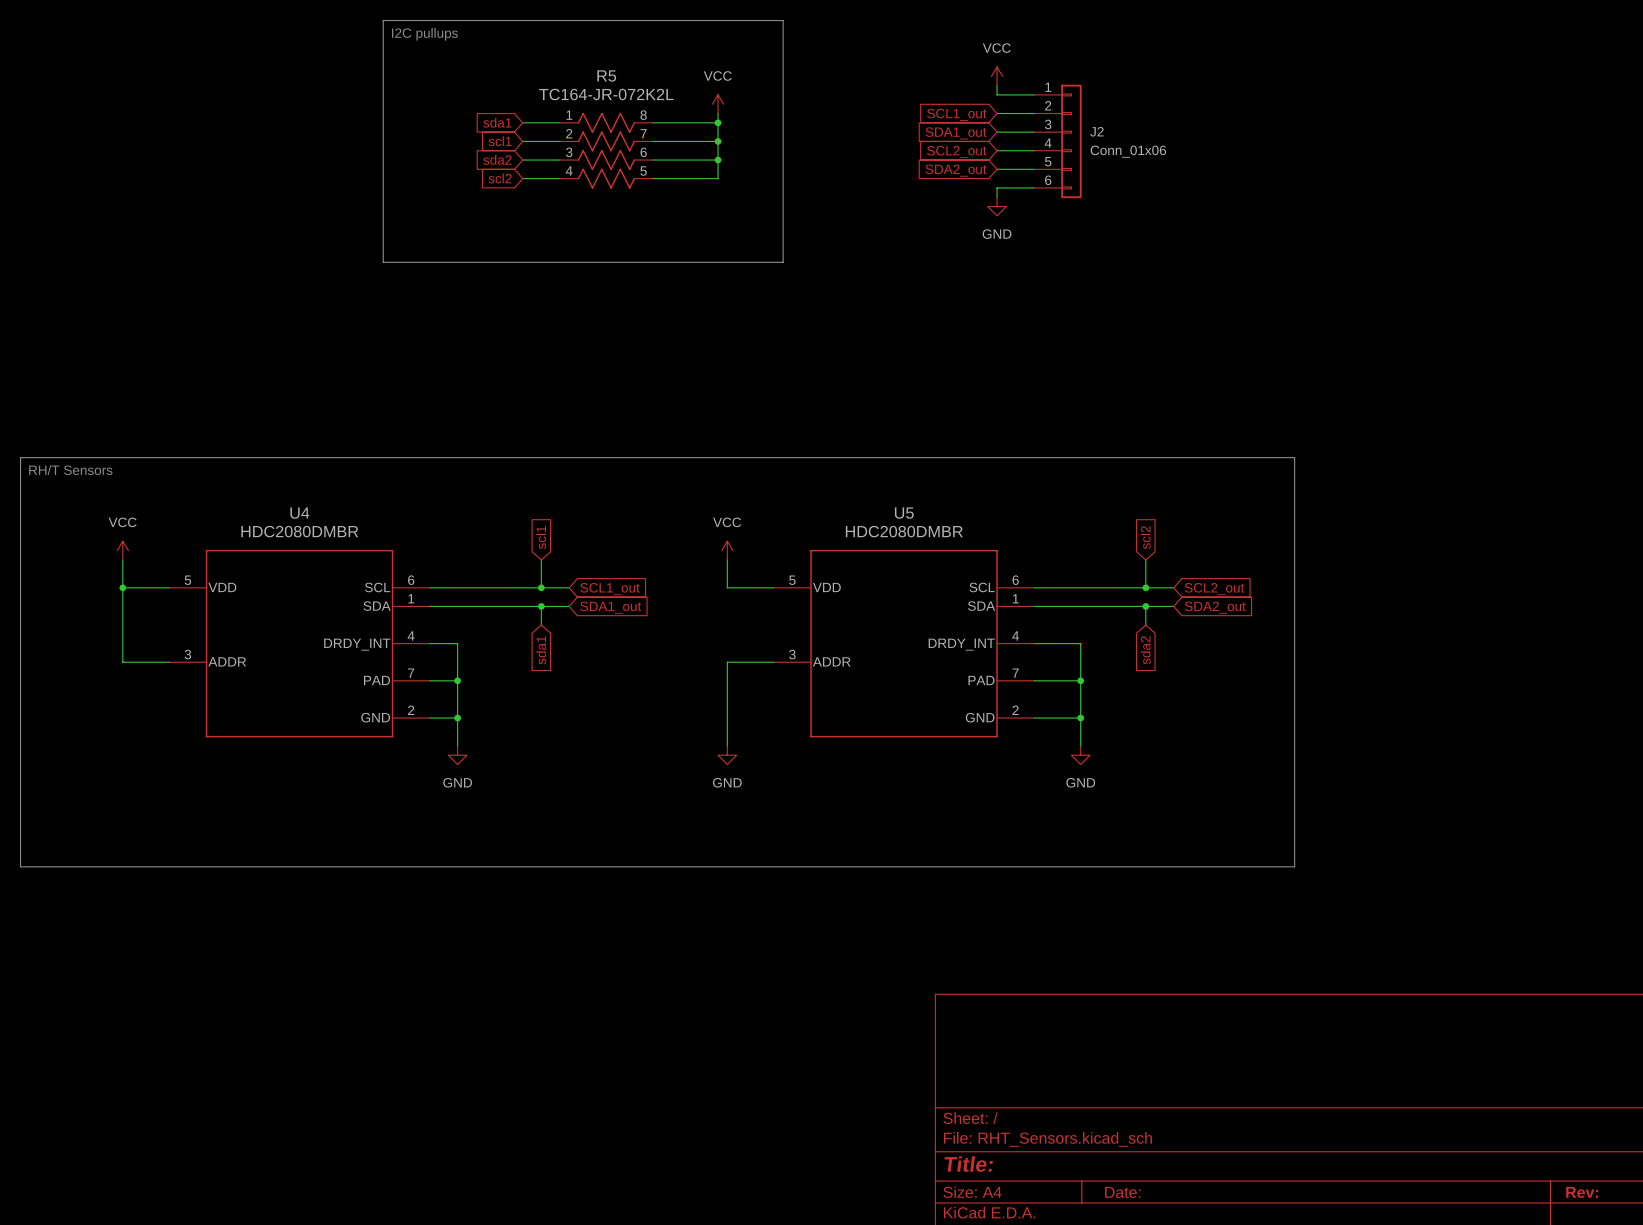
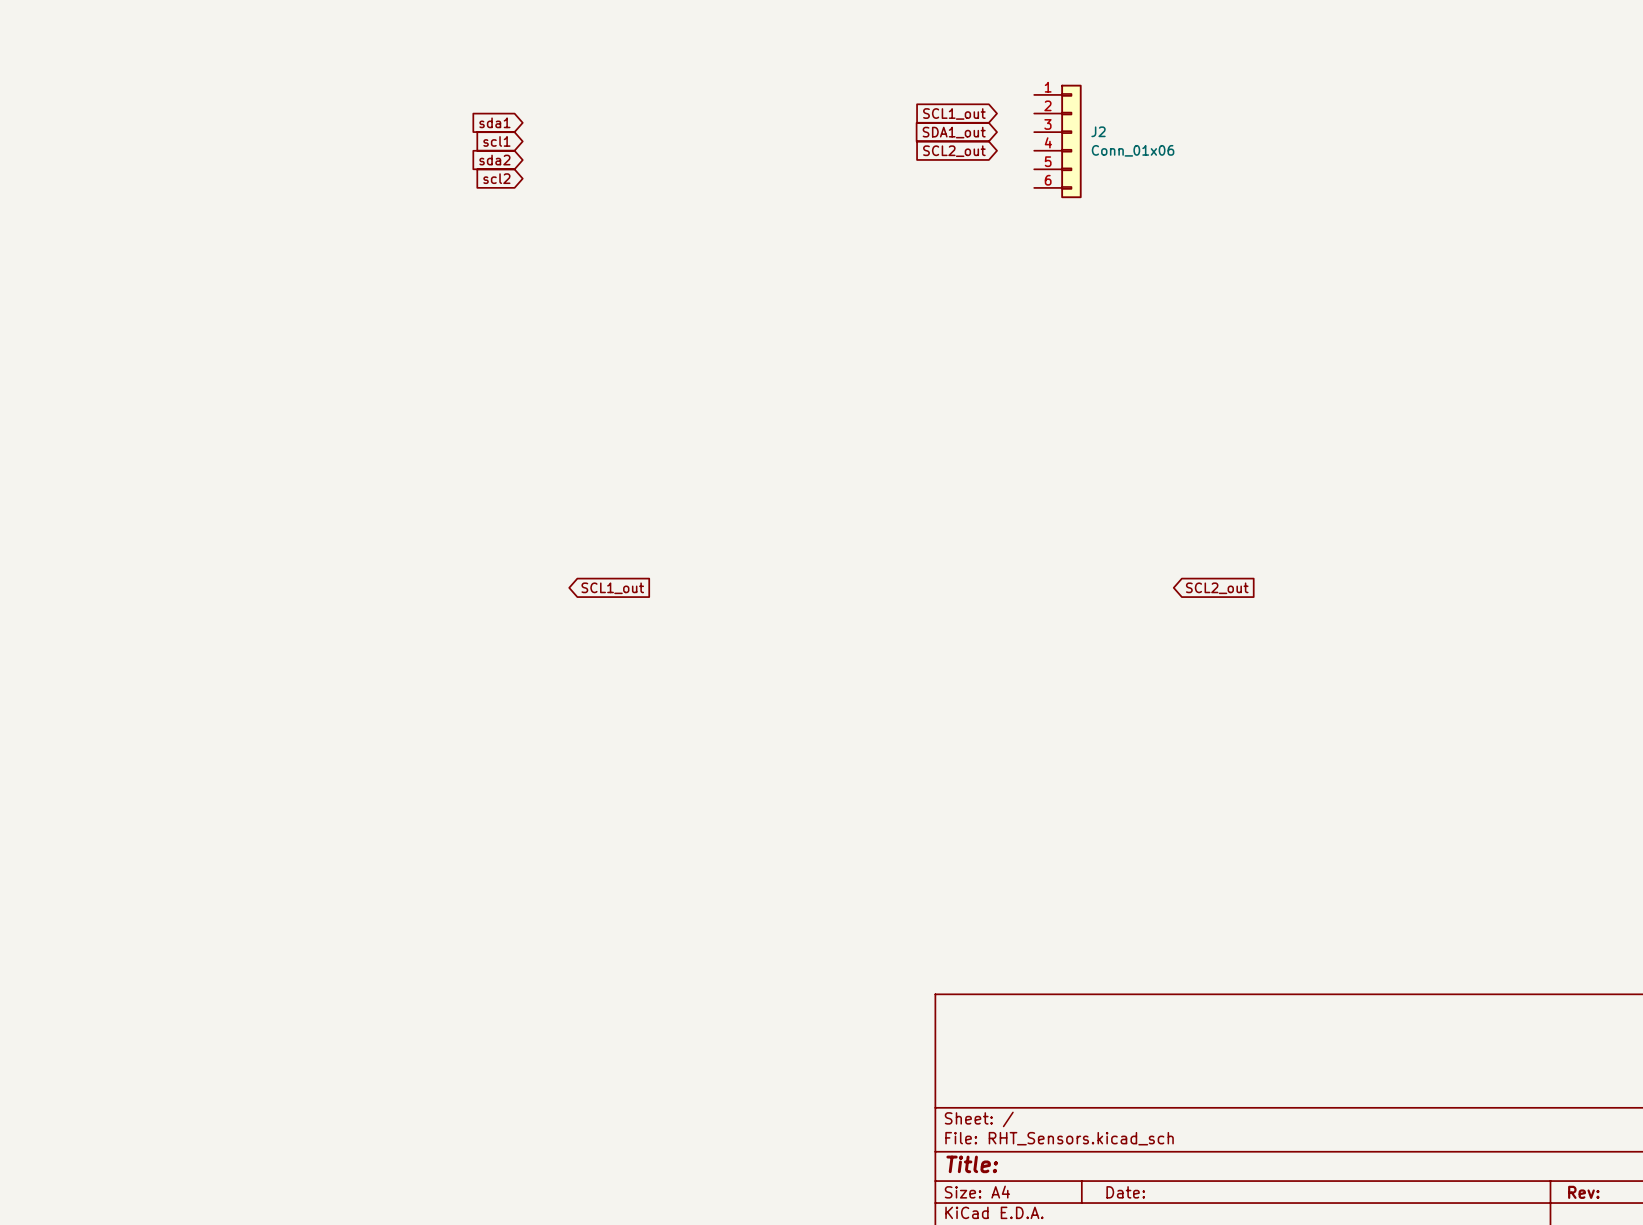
line: (383, 20) (783, 20) (783, 262) (383, 262) (383, 20) -> none
text: I2C pullups (424, 34) -> none
power symbol: VCC (997, 76) -> none
wire: (997, 85) (997, 94) (1034, 94) -> none
power symbol: VCC (718, 104) -> none
wire: (718, 113) (718, 178) (652, 178) -> none
wire: (997, 113) (1034, 113) -> none
wire: (522, 122) (559, 122) -> none
wire: (652, 122) (718, 122) -> none
junction: (718, 122) -> none
wire: (997, 132) (1034, 132) -> none
wire: (522, 141) (559, 141) -> none
wire: (652, 141) (718, 141) -> none
junction: (718, 141) -> none
R5: TC164-JR-072K2L (606, 150) -> none
wire: (997, 150) (1034, 150) -> none
wire: (522, 160) (559, 160) -> none
wire: (652, 160) (718, 160) -> none
junction: (718, 160) -> none
wire: (997, 169) (1034, 169) -> none
global label: SDA2_out (956, 170) -> none
wire: (522, 178) (559, 178) -> none
wire: (1034, 187) (997, 187) (997, 197) -> none
power symbol: GND (997, 206) -> none
line: (20, 457) (1294, 457) (1294, 866) (20, 866) (20, 457) -> none
text: RH/T Sensors (70, 470) -> none
global label: scl1 (541, 537) -> none
global label: scl2 (1145, 537) -> none
power symbol: VCC (122, 550) -> none
power symbol: VCC (727, 550) -> none
wire: (122, 559) (122, 662) (169, 662) -> none
wire: (541, 559) (541, 587) -> none
wire: (727, 559) (727, 587) (773, 587) -> none
wire: (1145, 559) (1145, 587) -> none
wire: (122, 587) (169, 587) -> none
junction: (122, 587) -> none
wire: (429, 587) (569, 587) -> none
junction: (541, 587) -> none
wire: (1034, 587) (1173, 587) -> none
junction: (1145, 587) -> none
wire: (429, 606) (569, 606) -> none
wire: (541, 606) (541, 625) -> none
junction: (541, 606) -> none
wire: (1034, 606) (1173, 606) -> none
wire: (1145, 606) (1145, 625) -> none
junction: (1145, 606) -> none
global label: SDA1_out (610, 607) -> none
global label: SDA2_out (1215, 607) -> none
U4: HDC2080DMBR (299, 643) -> none
wire: (429, 643) (457, 643) (457, 745) -> none
U5: HDC2080DMBR (904, 643) -> none
wire: (1034, 643) (1080, 643) (1080, 745) -> none
global label: sda1 (541, 650) -> none
global label: sda2 (1145, 650) -> none
wire: (773, 662) (727, 662) (727, 745) -> none
wire: (429, 680) (457, 680) -> none
junction: (457, 680) -> none
wire: (1034, 680) (1080, 680) -> none
junction: (1080, 680) -> none
wire: (429, 718) (457, 718) -> none
junction: (457, 718) -> none
wire: (1034, 718) (1080, 718) -> none
junction: (1080, 718) -> none
power symbol: GND (457, 755) -> none
power symbol: GND (727, 755) -> none
power symbol: GND (1080, 755) -> none

